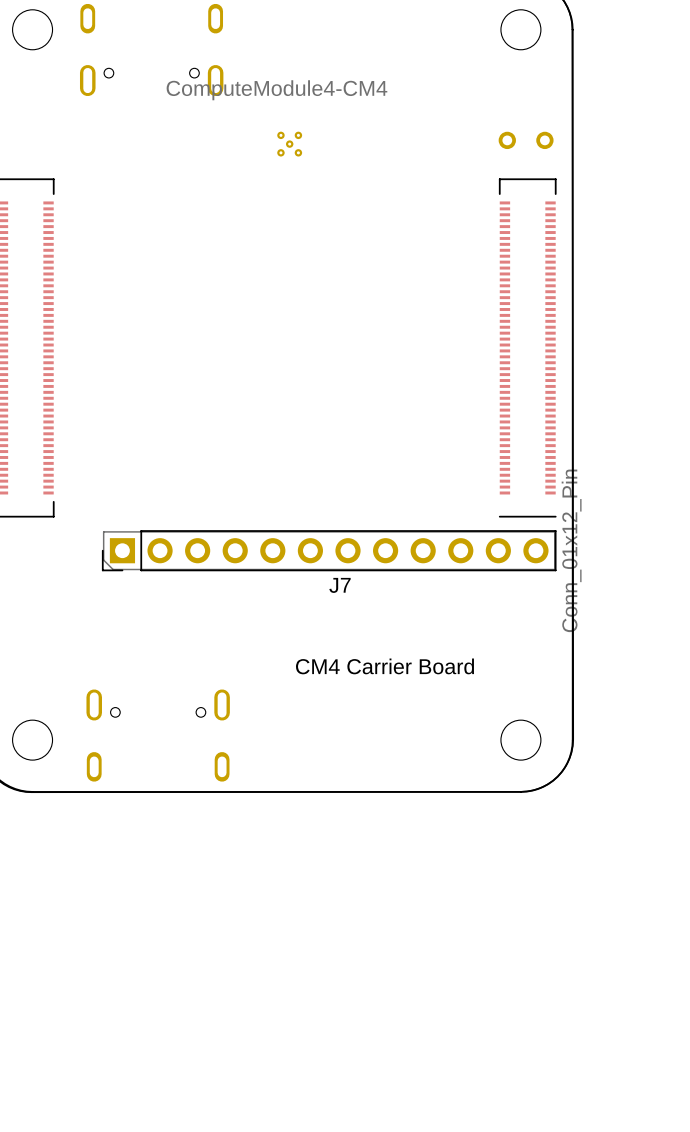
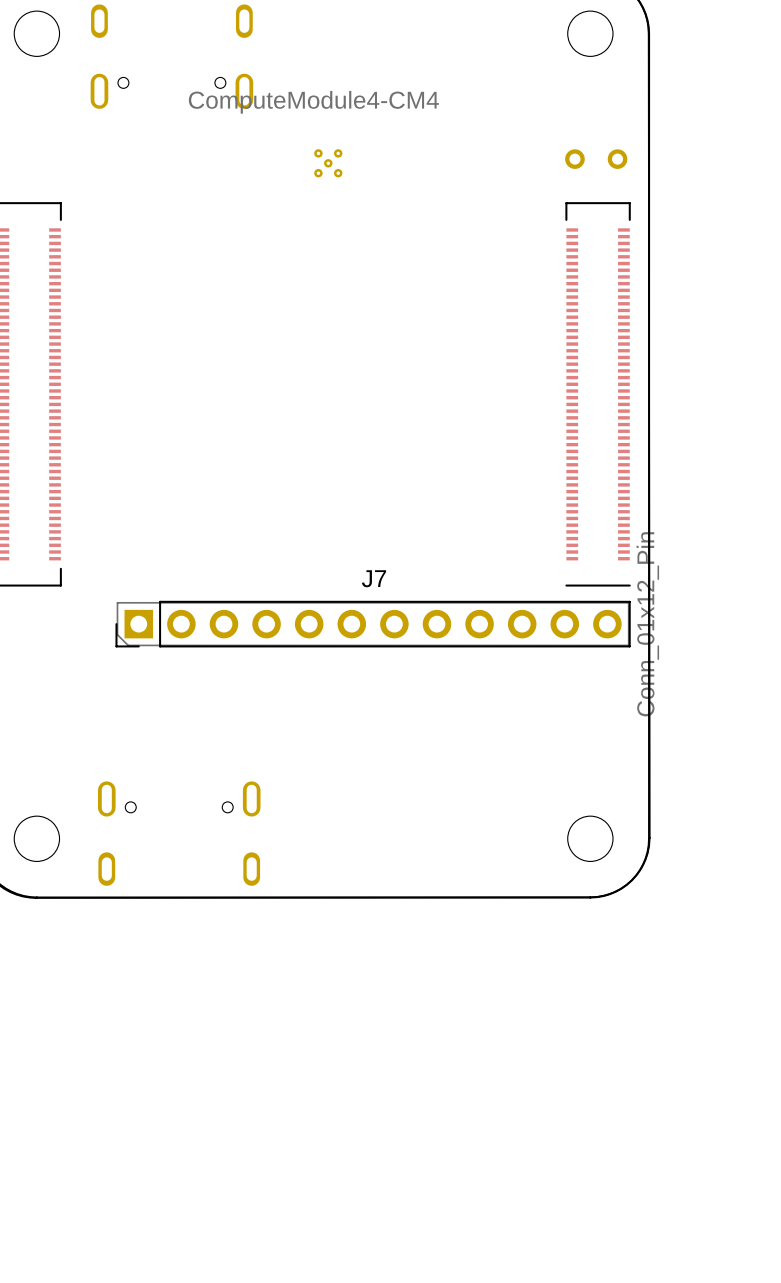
J7 name position: J7 (340, 585) -> J7 (374, 578)
text: CM4 Carrier Board (384, 666) -> none

